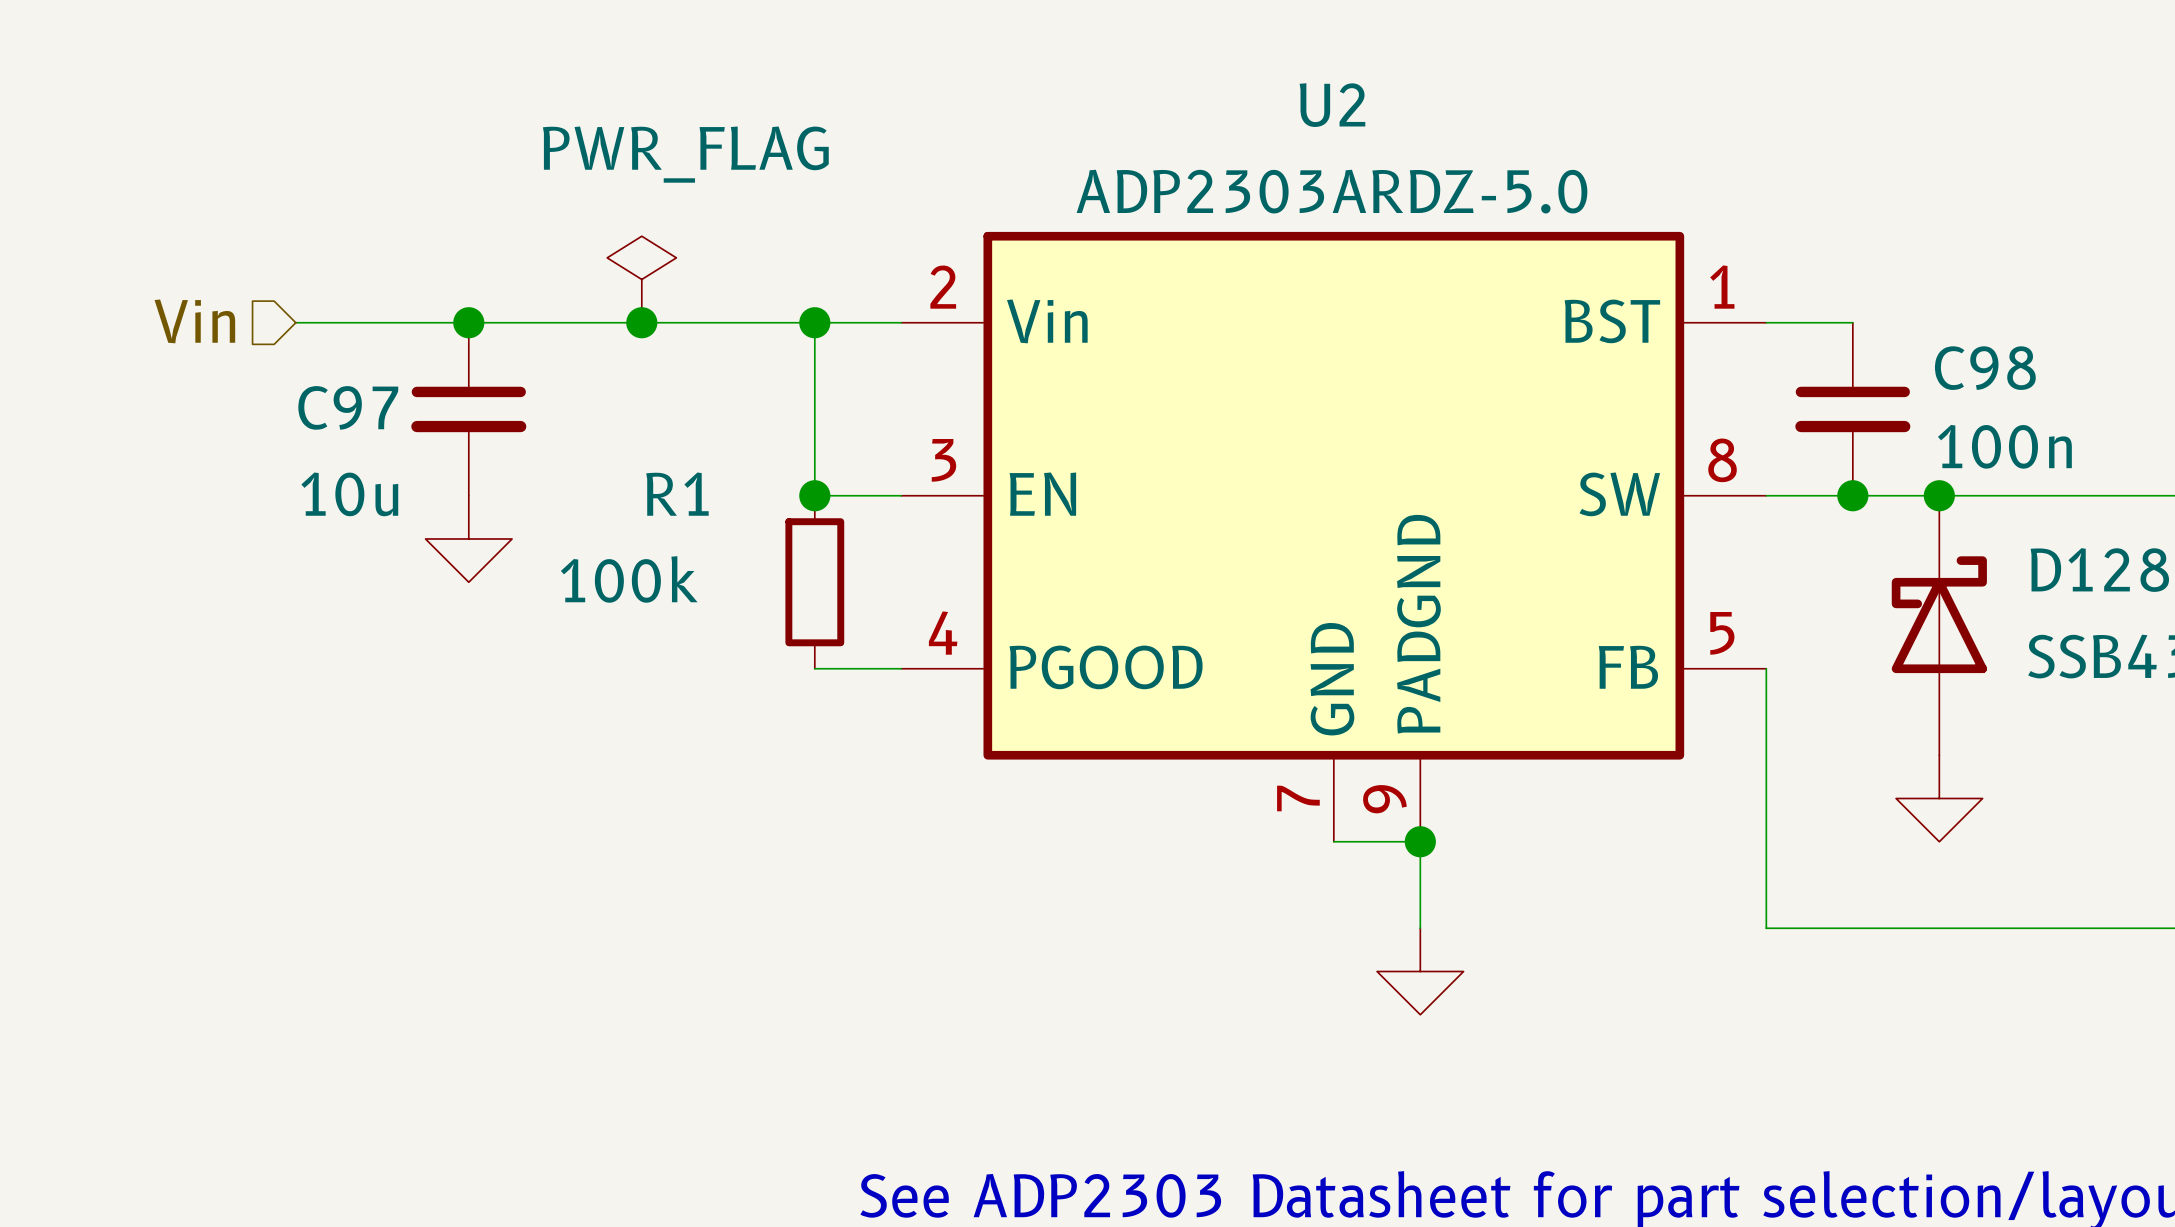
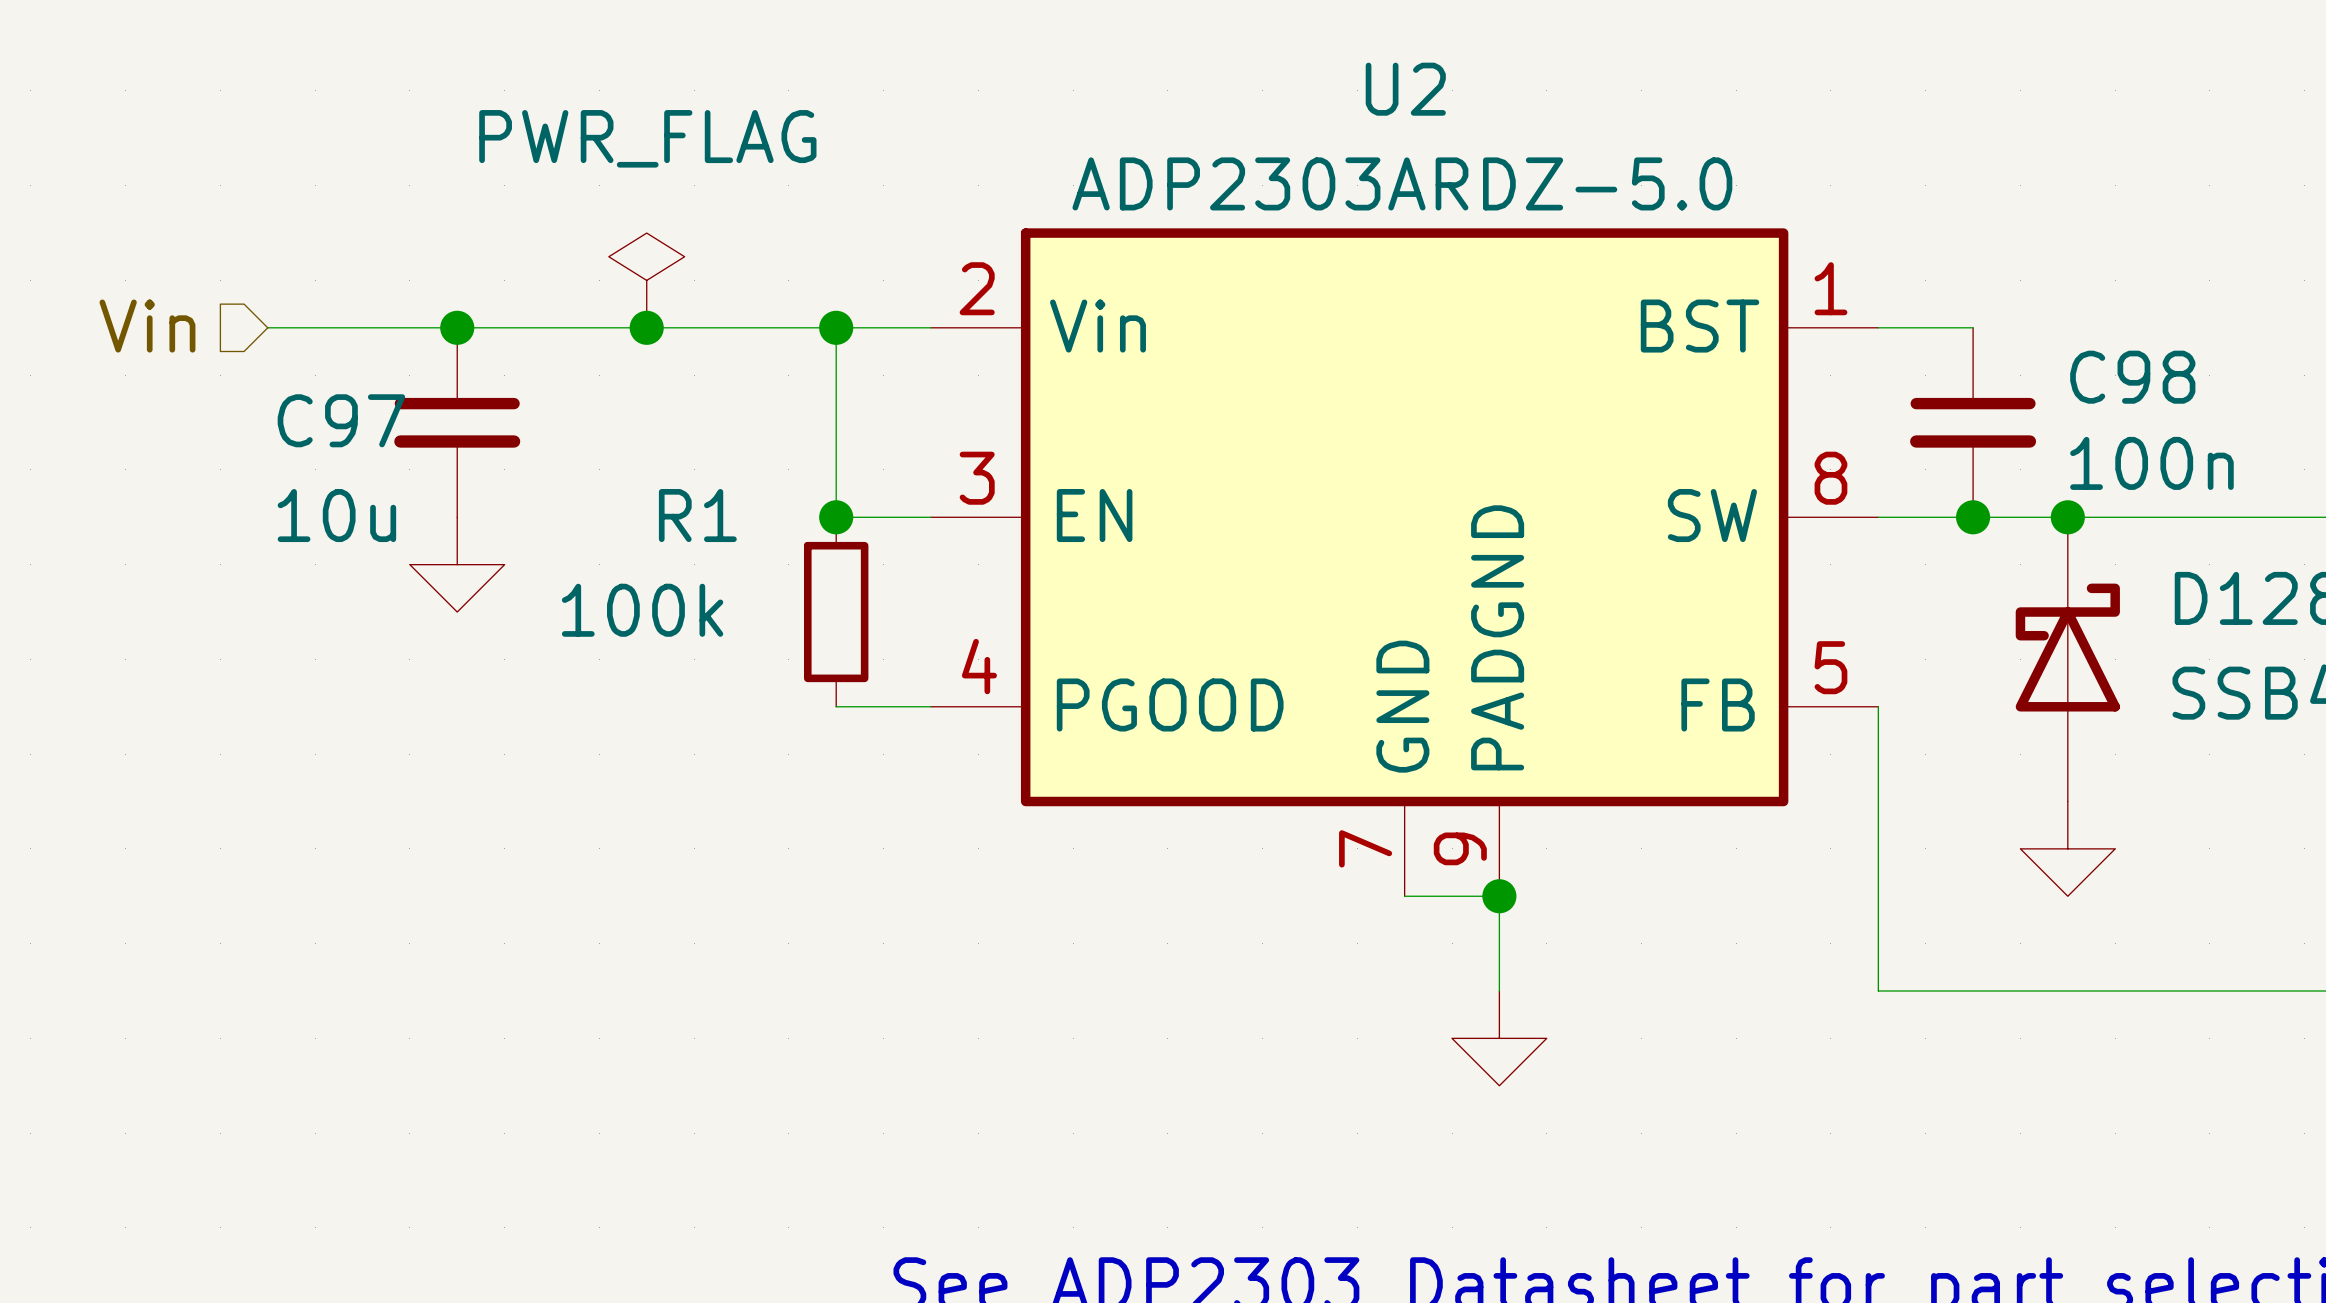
power symbol text position: PWR_FLAG (685, 154) -> PWR_FLAG (647, 138)

